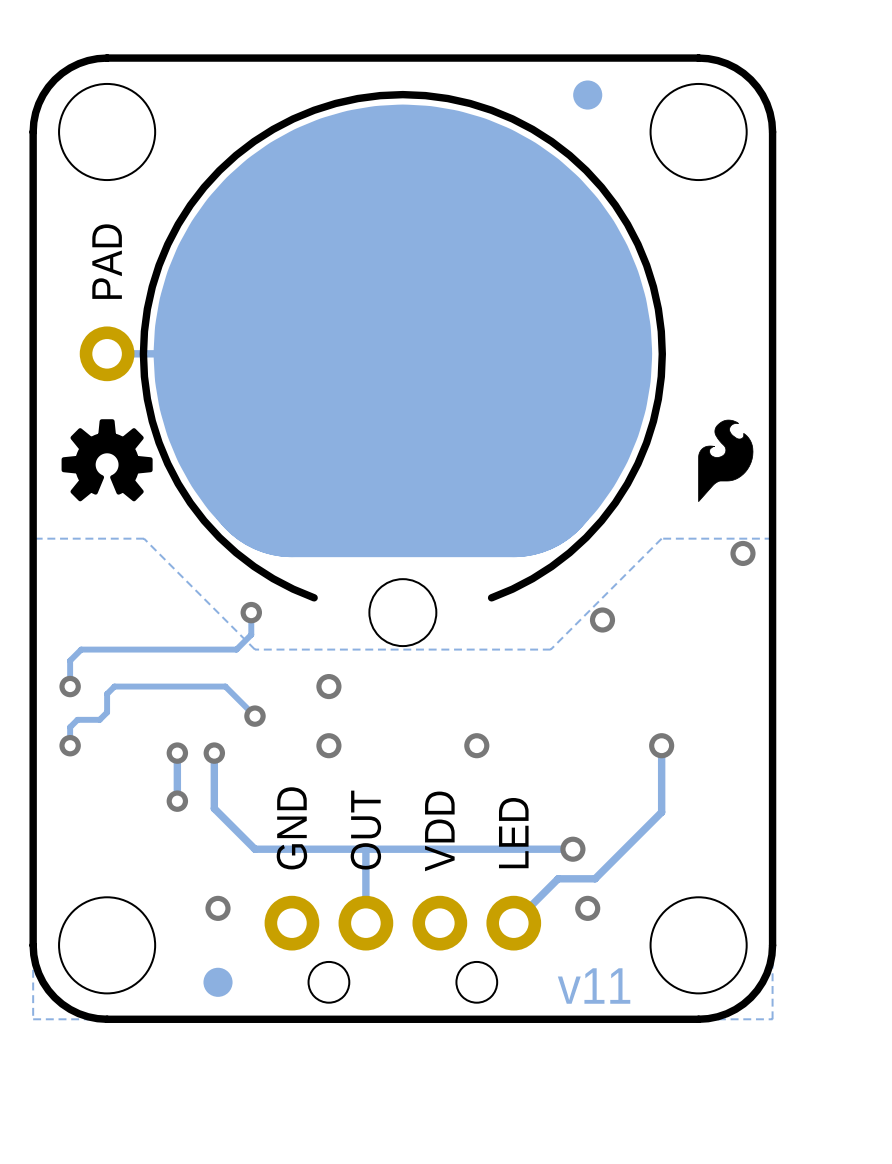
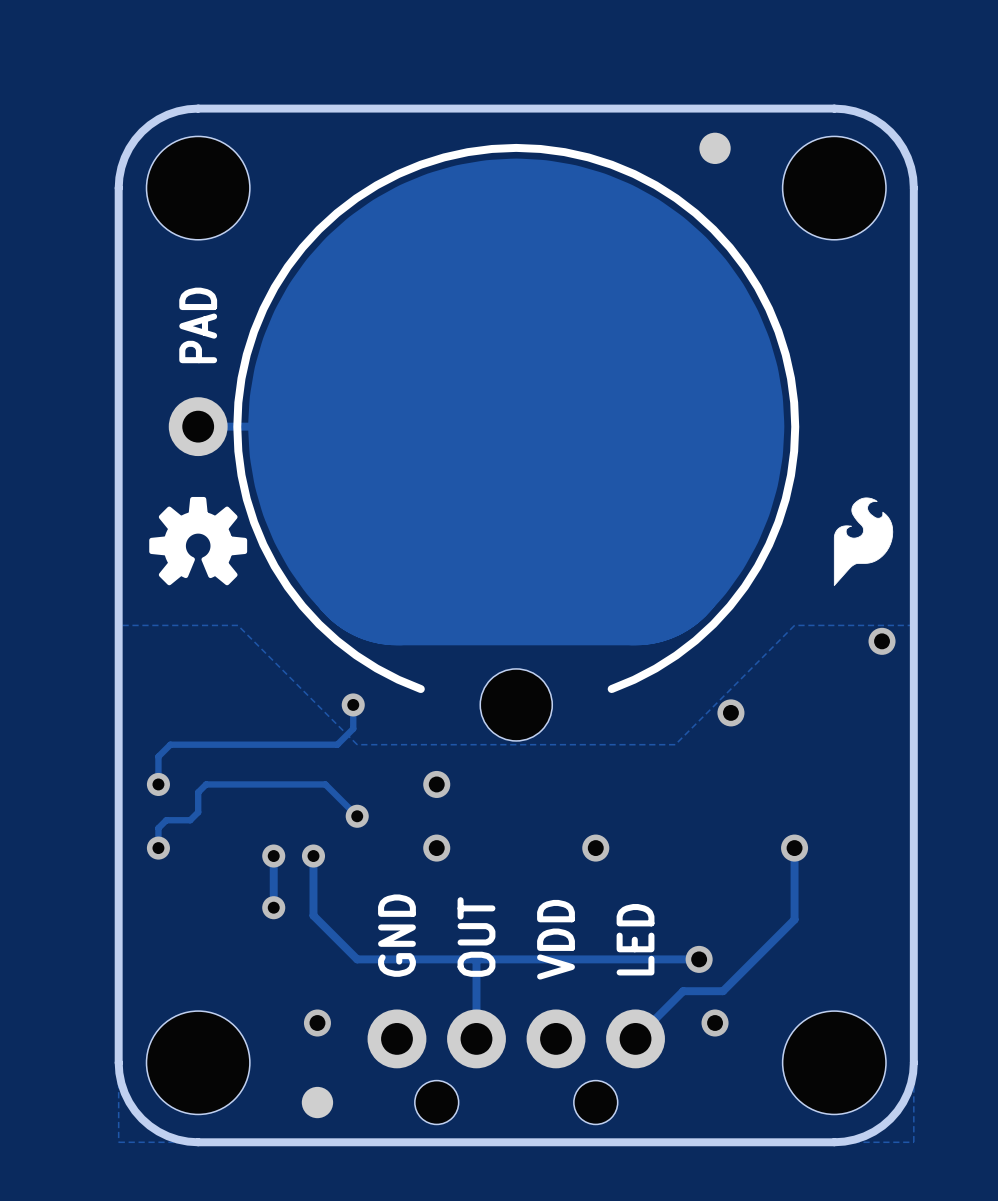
text: v11 (594, 986) -> none

